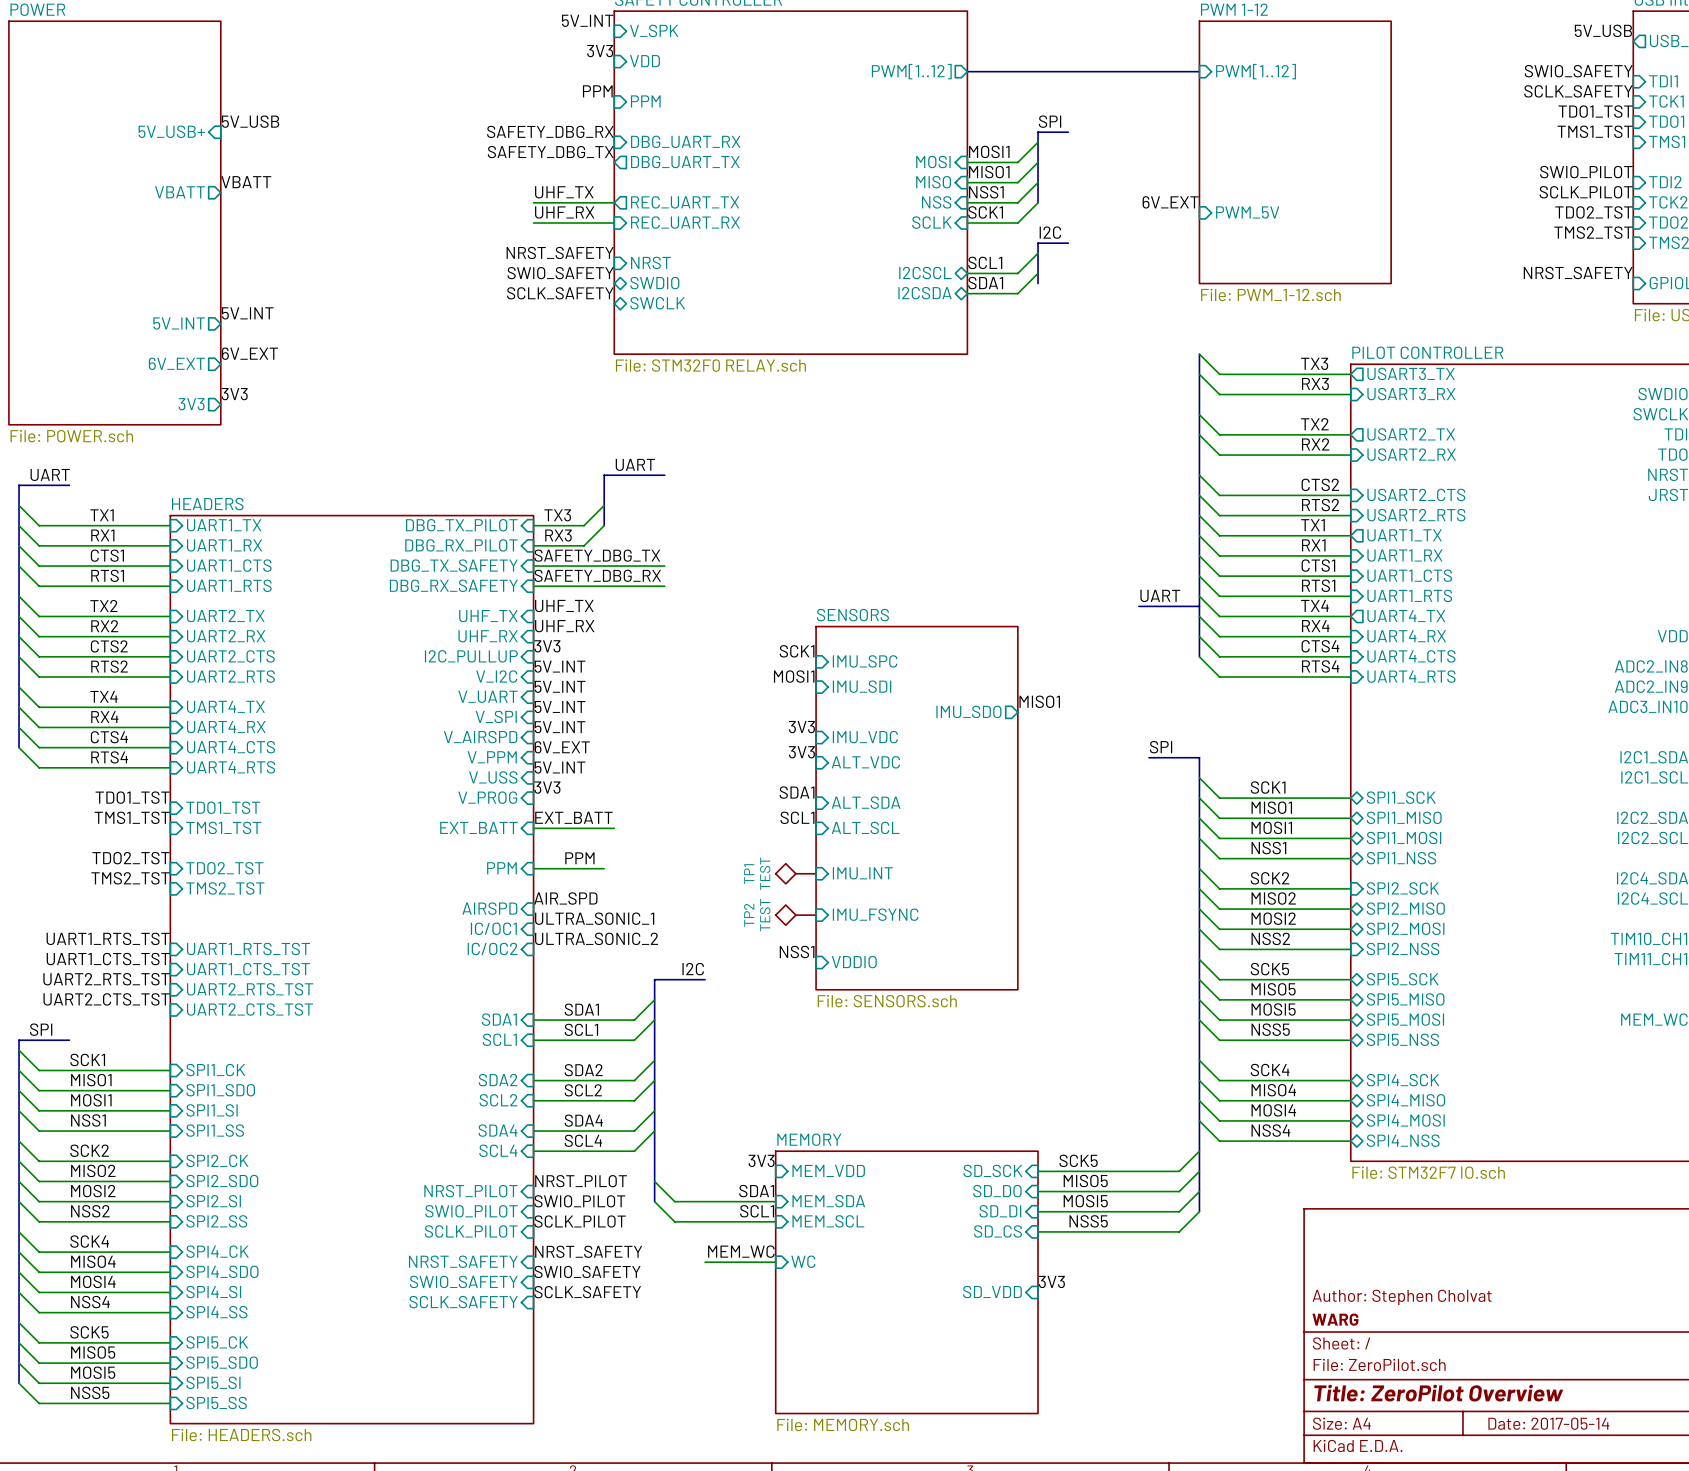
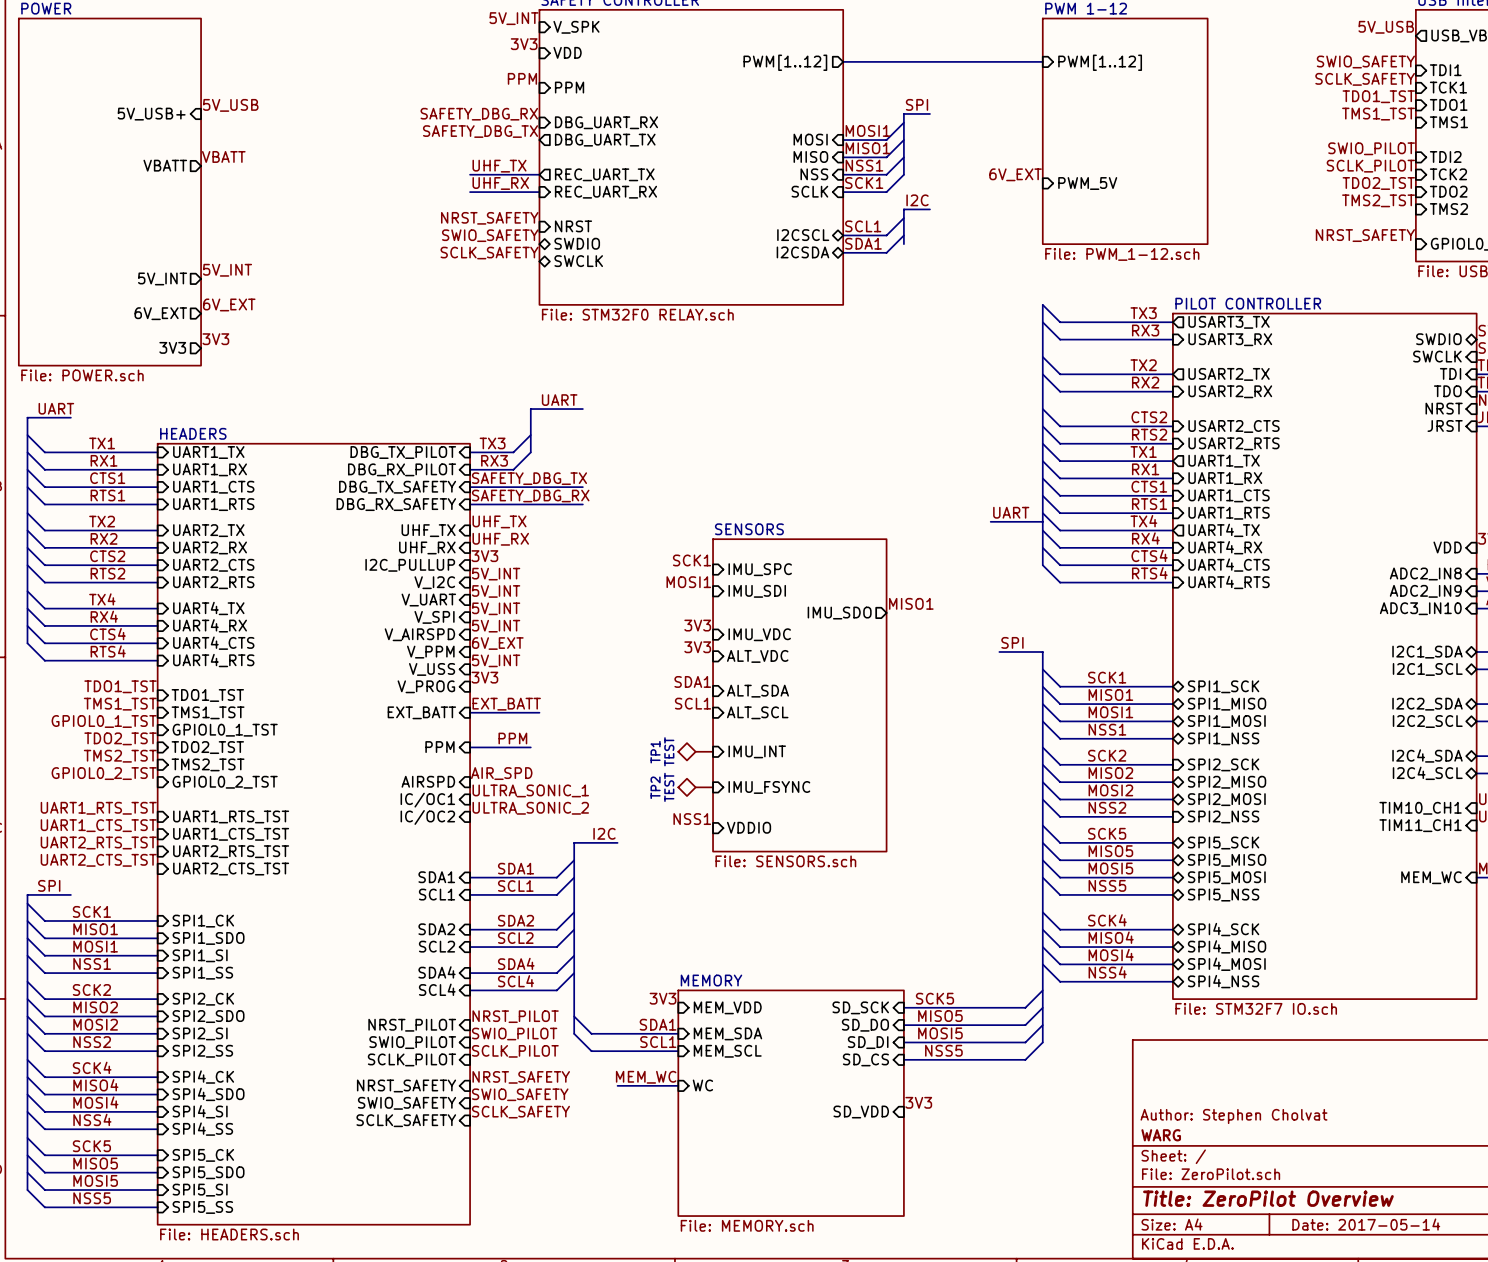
label: none -> GPIOL0_1_TST (104, 721)
sheet pin: none -> GPIOL0_1_TST (225, 730)
label: none -> GPIOL0_2_TST (104, 773)
sheet pin: none -> GPIOL0_2_TST (225, 782)

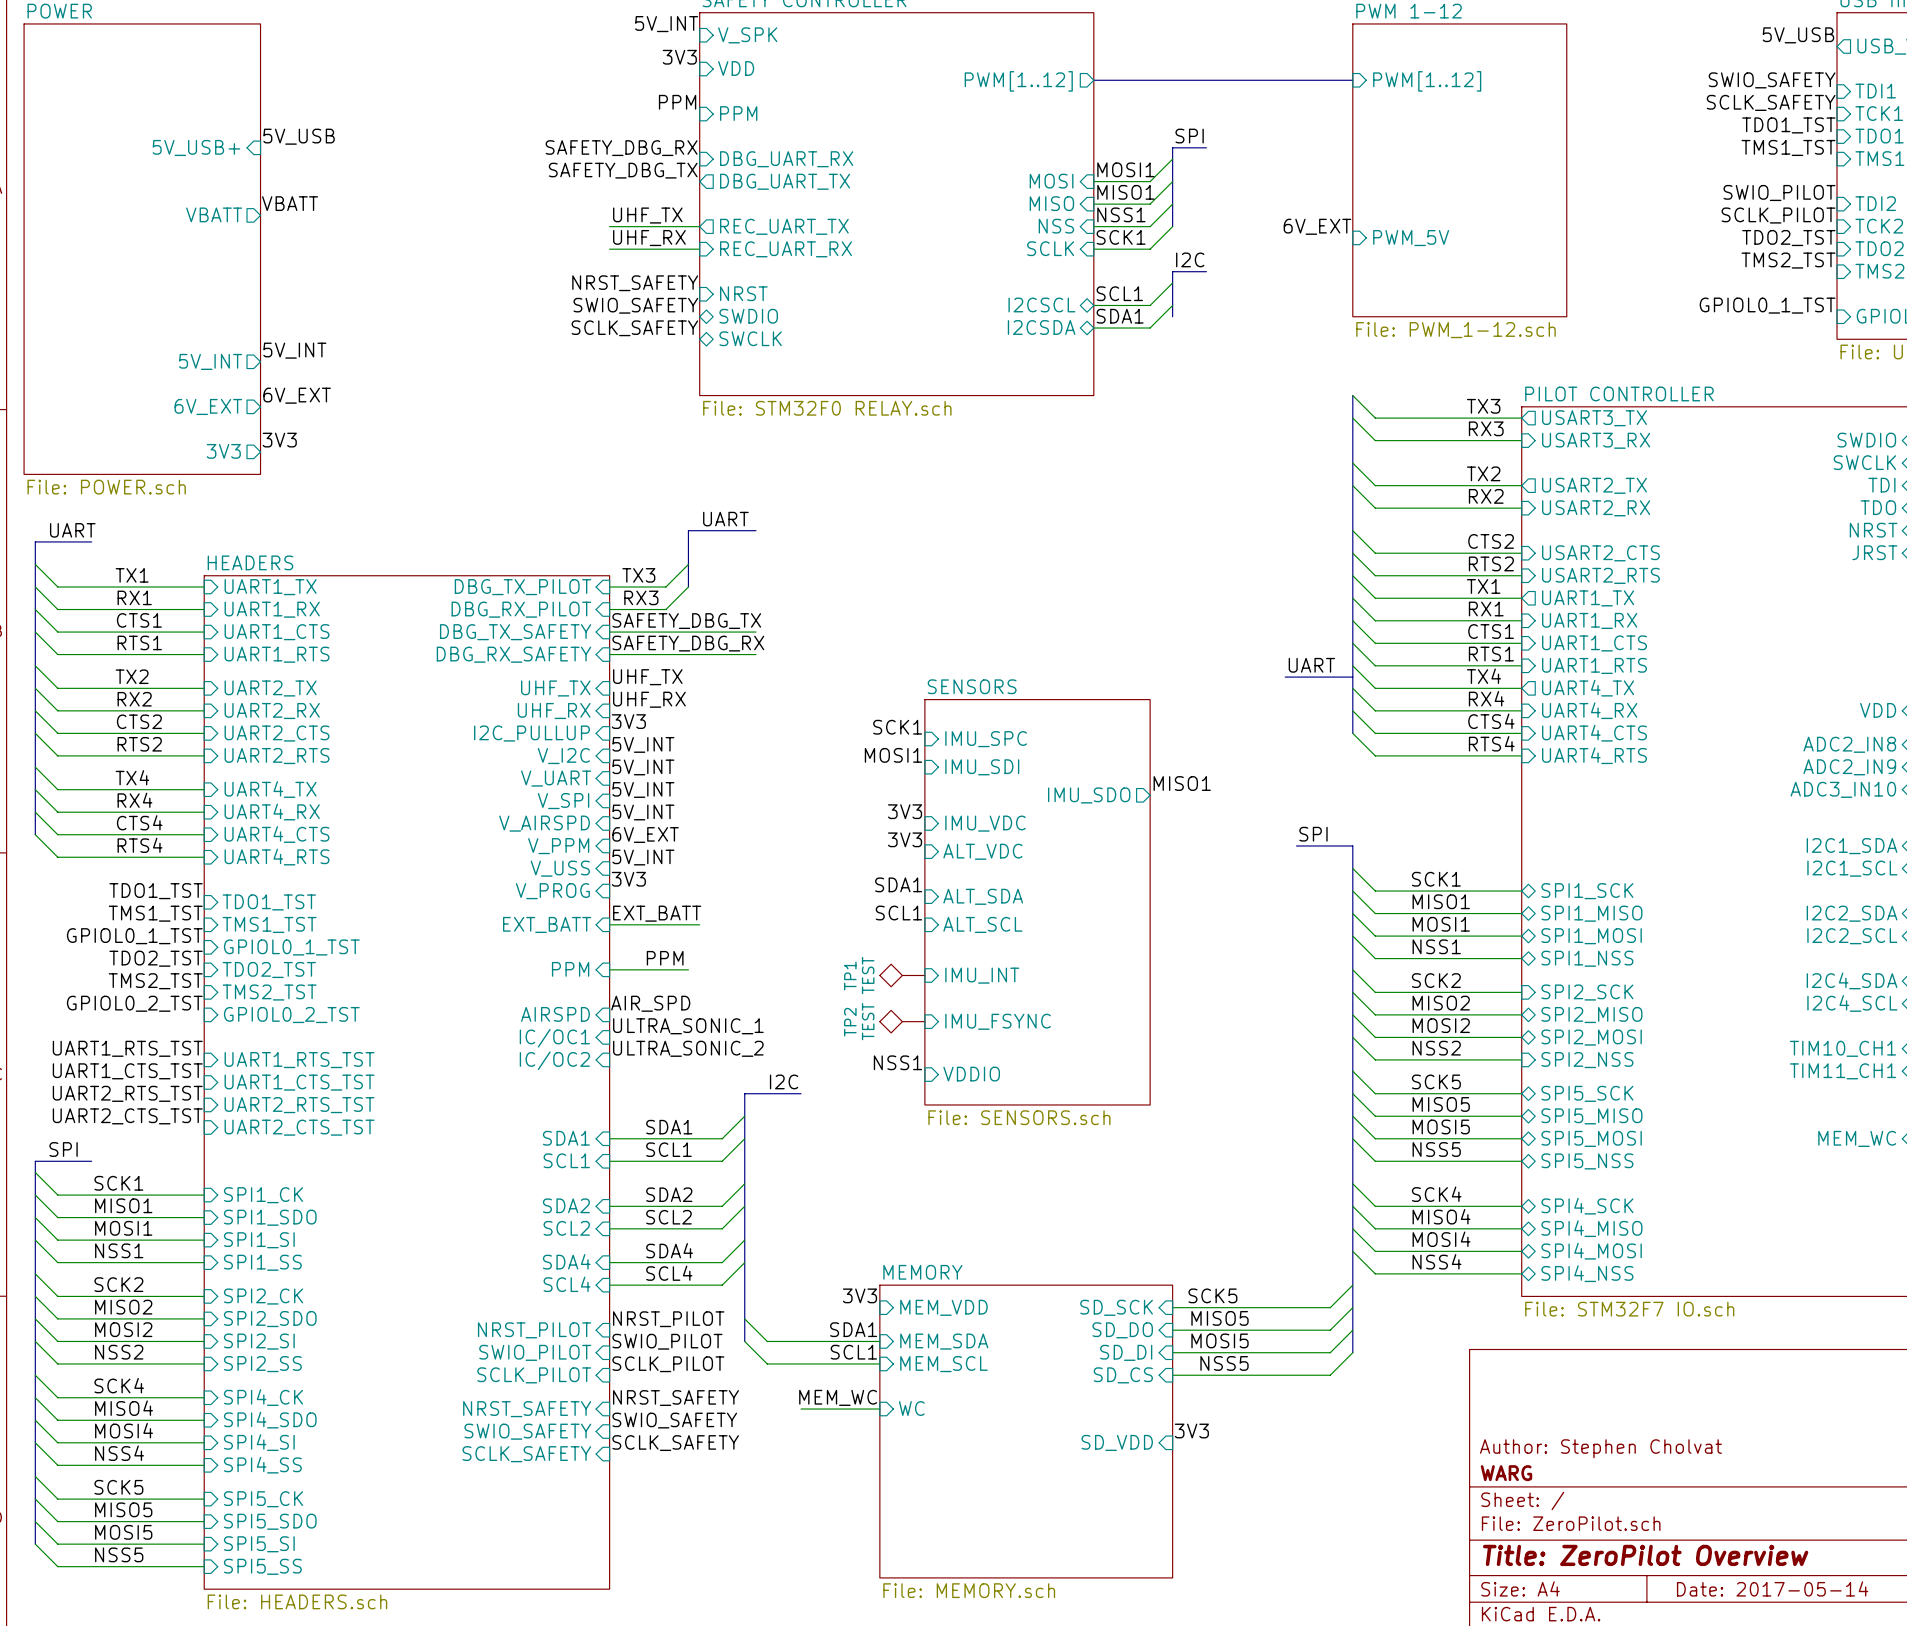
label: NRST_SAFETY (1365, 235) -> GPIOL0_1_TST (1767, 305)

